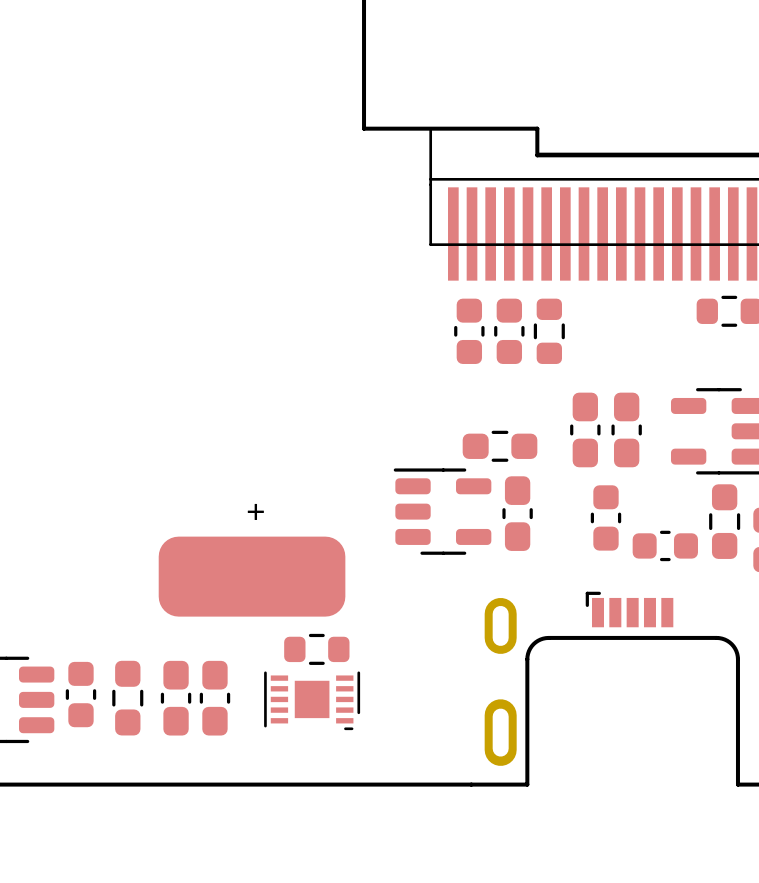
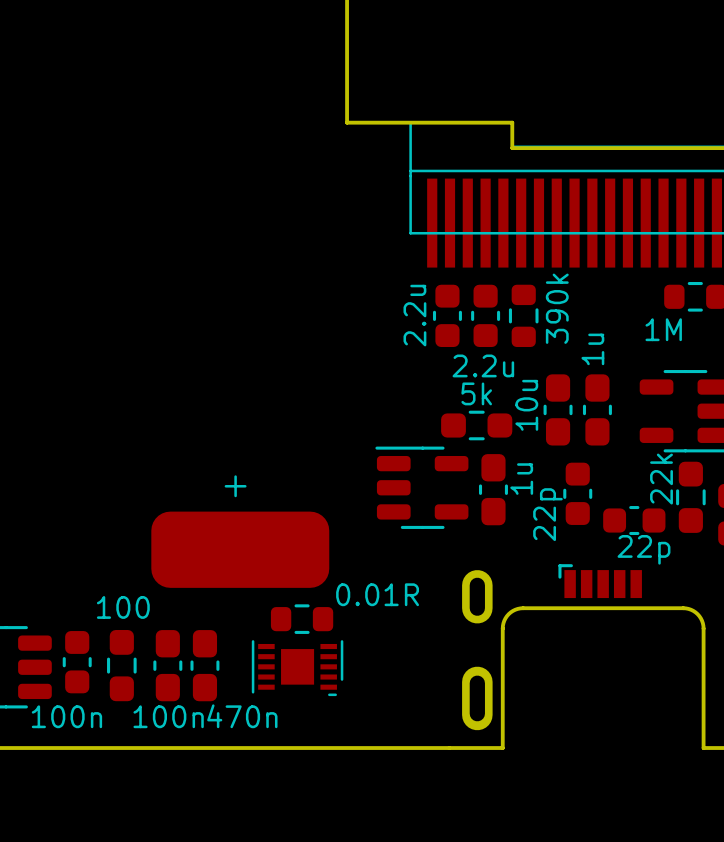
part value: none -> 390k (557, 308)
part value: none -> 2.2u (414, 315)
part value: none -> 1M (663, 329)
part value: none -> 1u (592, 349)
part value: none -> 2.2u (483, 365)
part value: none -> 5k (476, 393)
part value: none -> 10u (526, 405)
part value: none -> 22k (661, 479)
part value: none -> 1u (521, 479)
part value: none -> 22p (547, 514)
part value: none -> 22p (643, 549)
part value: none -> 0.01R (377, 594)
part value: none -> 100 (123, 607)
part value: none -> 100n (66, 716)
part value: none -> 100n (168, 716)
part value: none -> 470n (242, 716)

